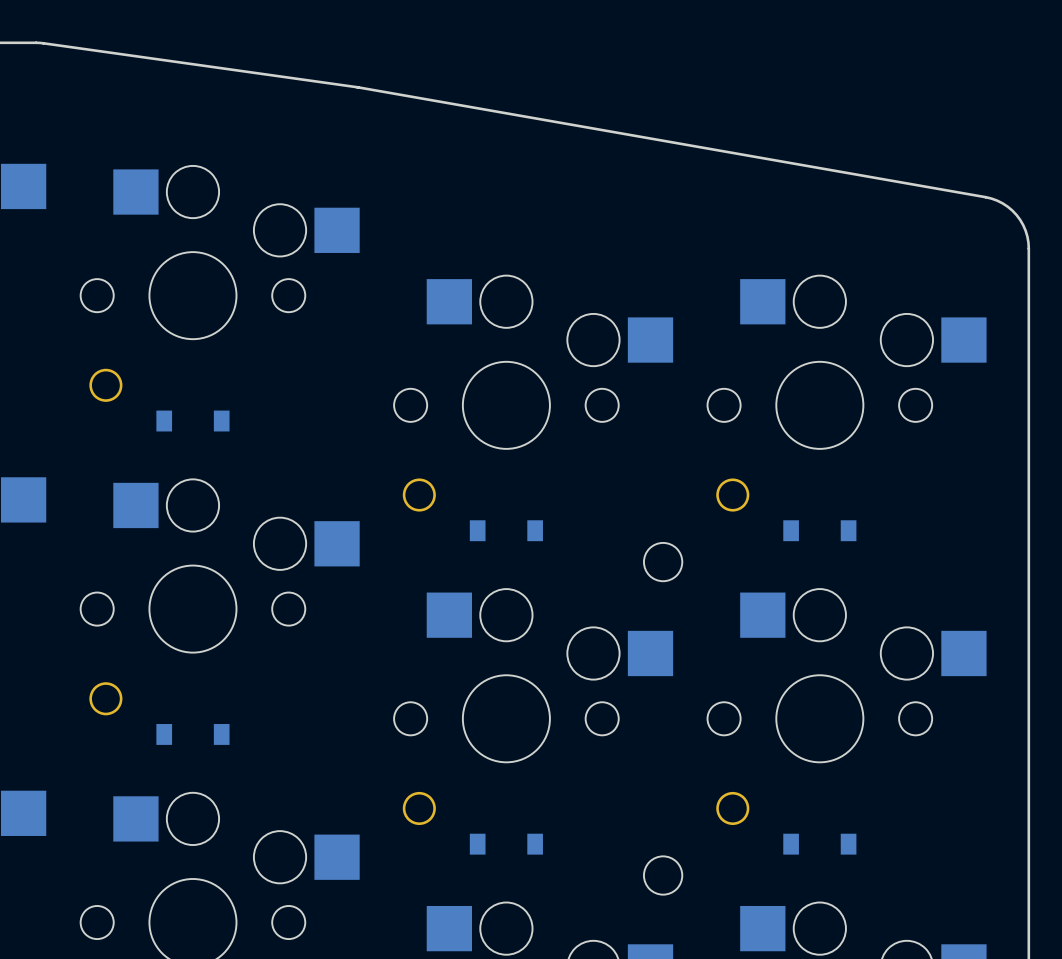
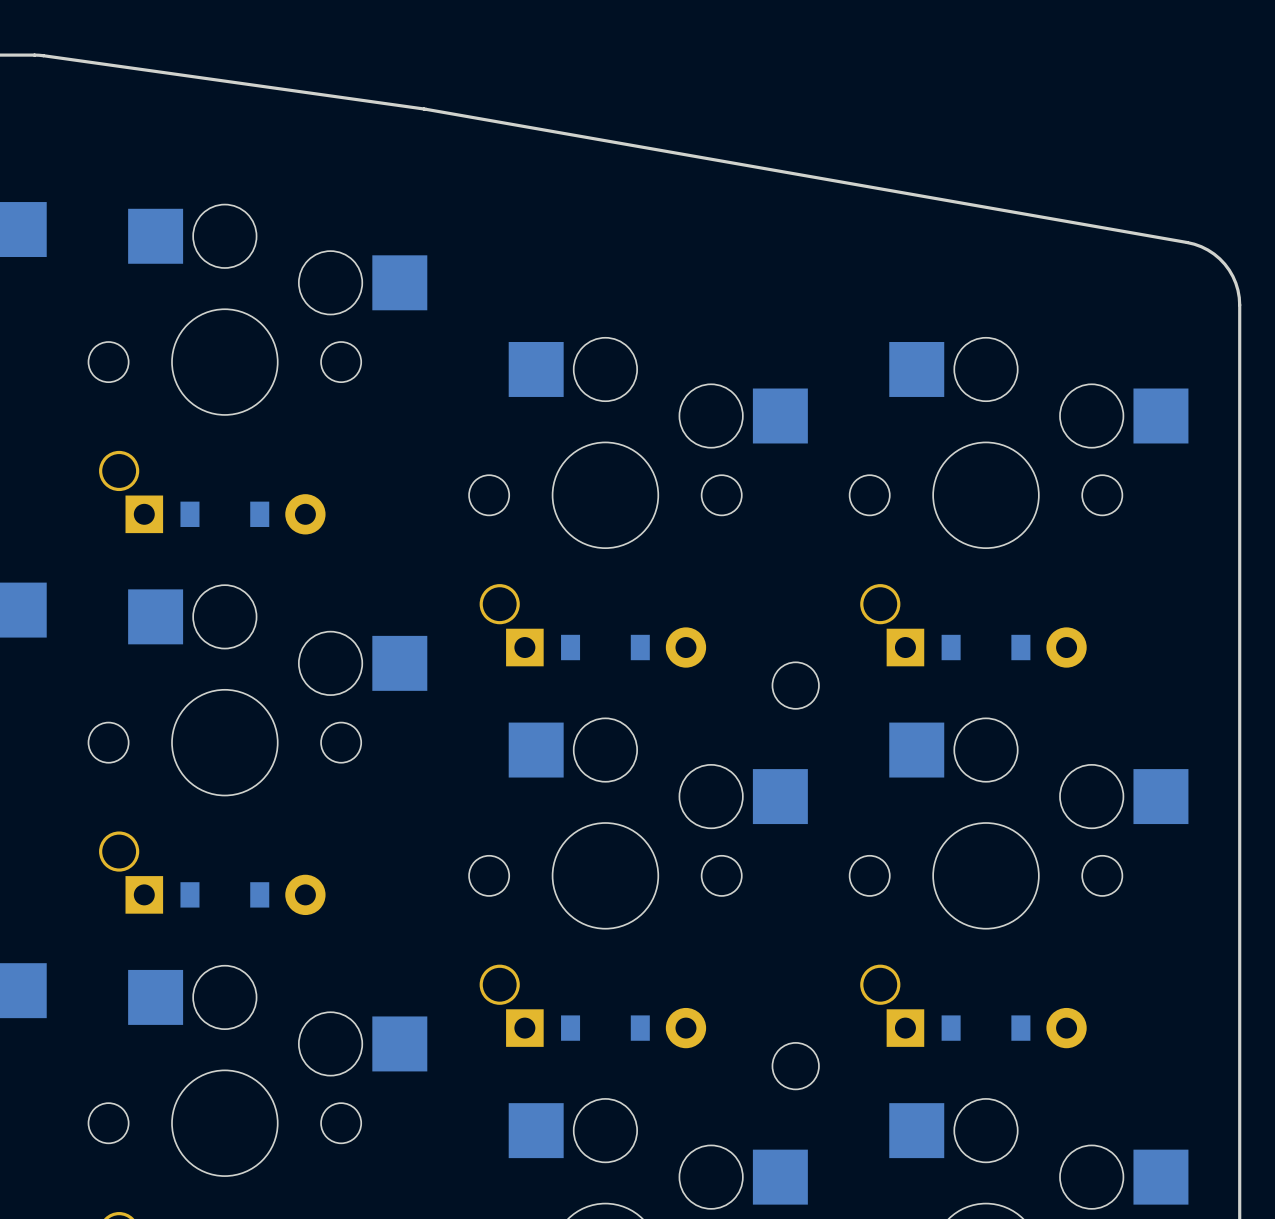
part footprint: [156, 410, 230, 432] -> [125, 494, 326, 535]
part footprint: [469, 520, 543, 542] -> [506, 627, 707, 668]
part footprint: [783, 520, 857, 542] -> [886, 627, 1087, 668]
part footprint: [156, 724, 230, 745] -> [125, 874, 326, 916]
part footprint: [469, 833, 543, 855] -> [506, 1007, 707, 1049]
part footprint: [783, 833, 857, 855] -> [886, 1007, 1087, 1049]

